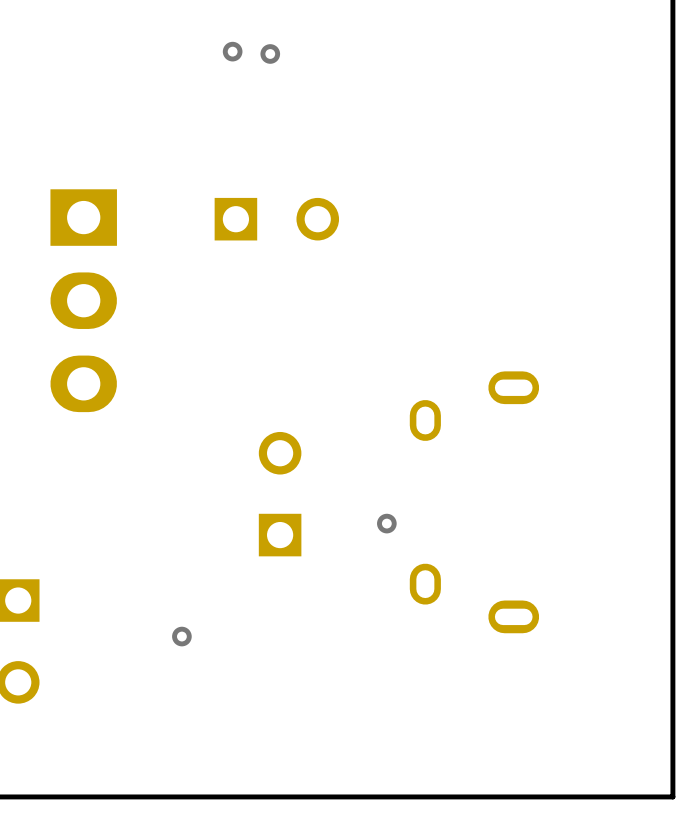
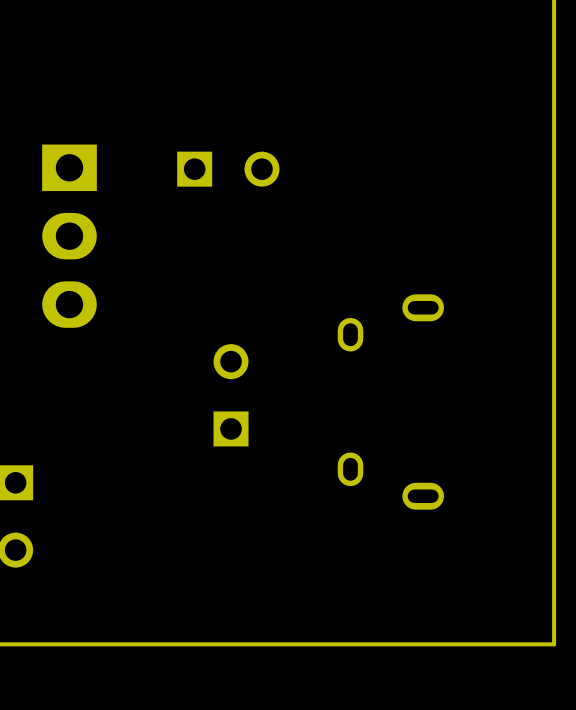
via: (232, 51) -> none
via: (270, 53) -> none
via: (386, 523) -> none
via: (181, 636) -> none

